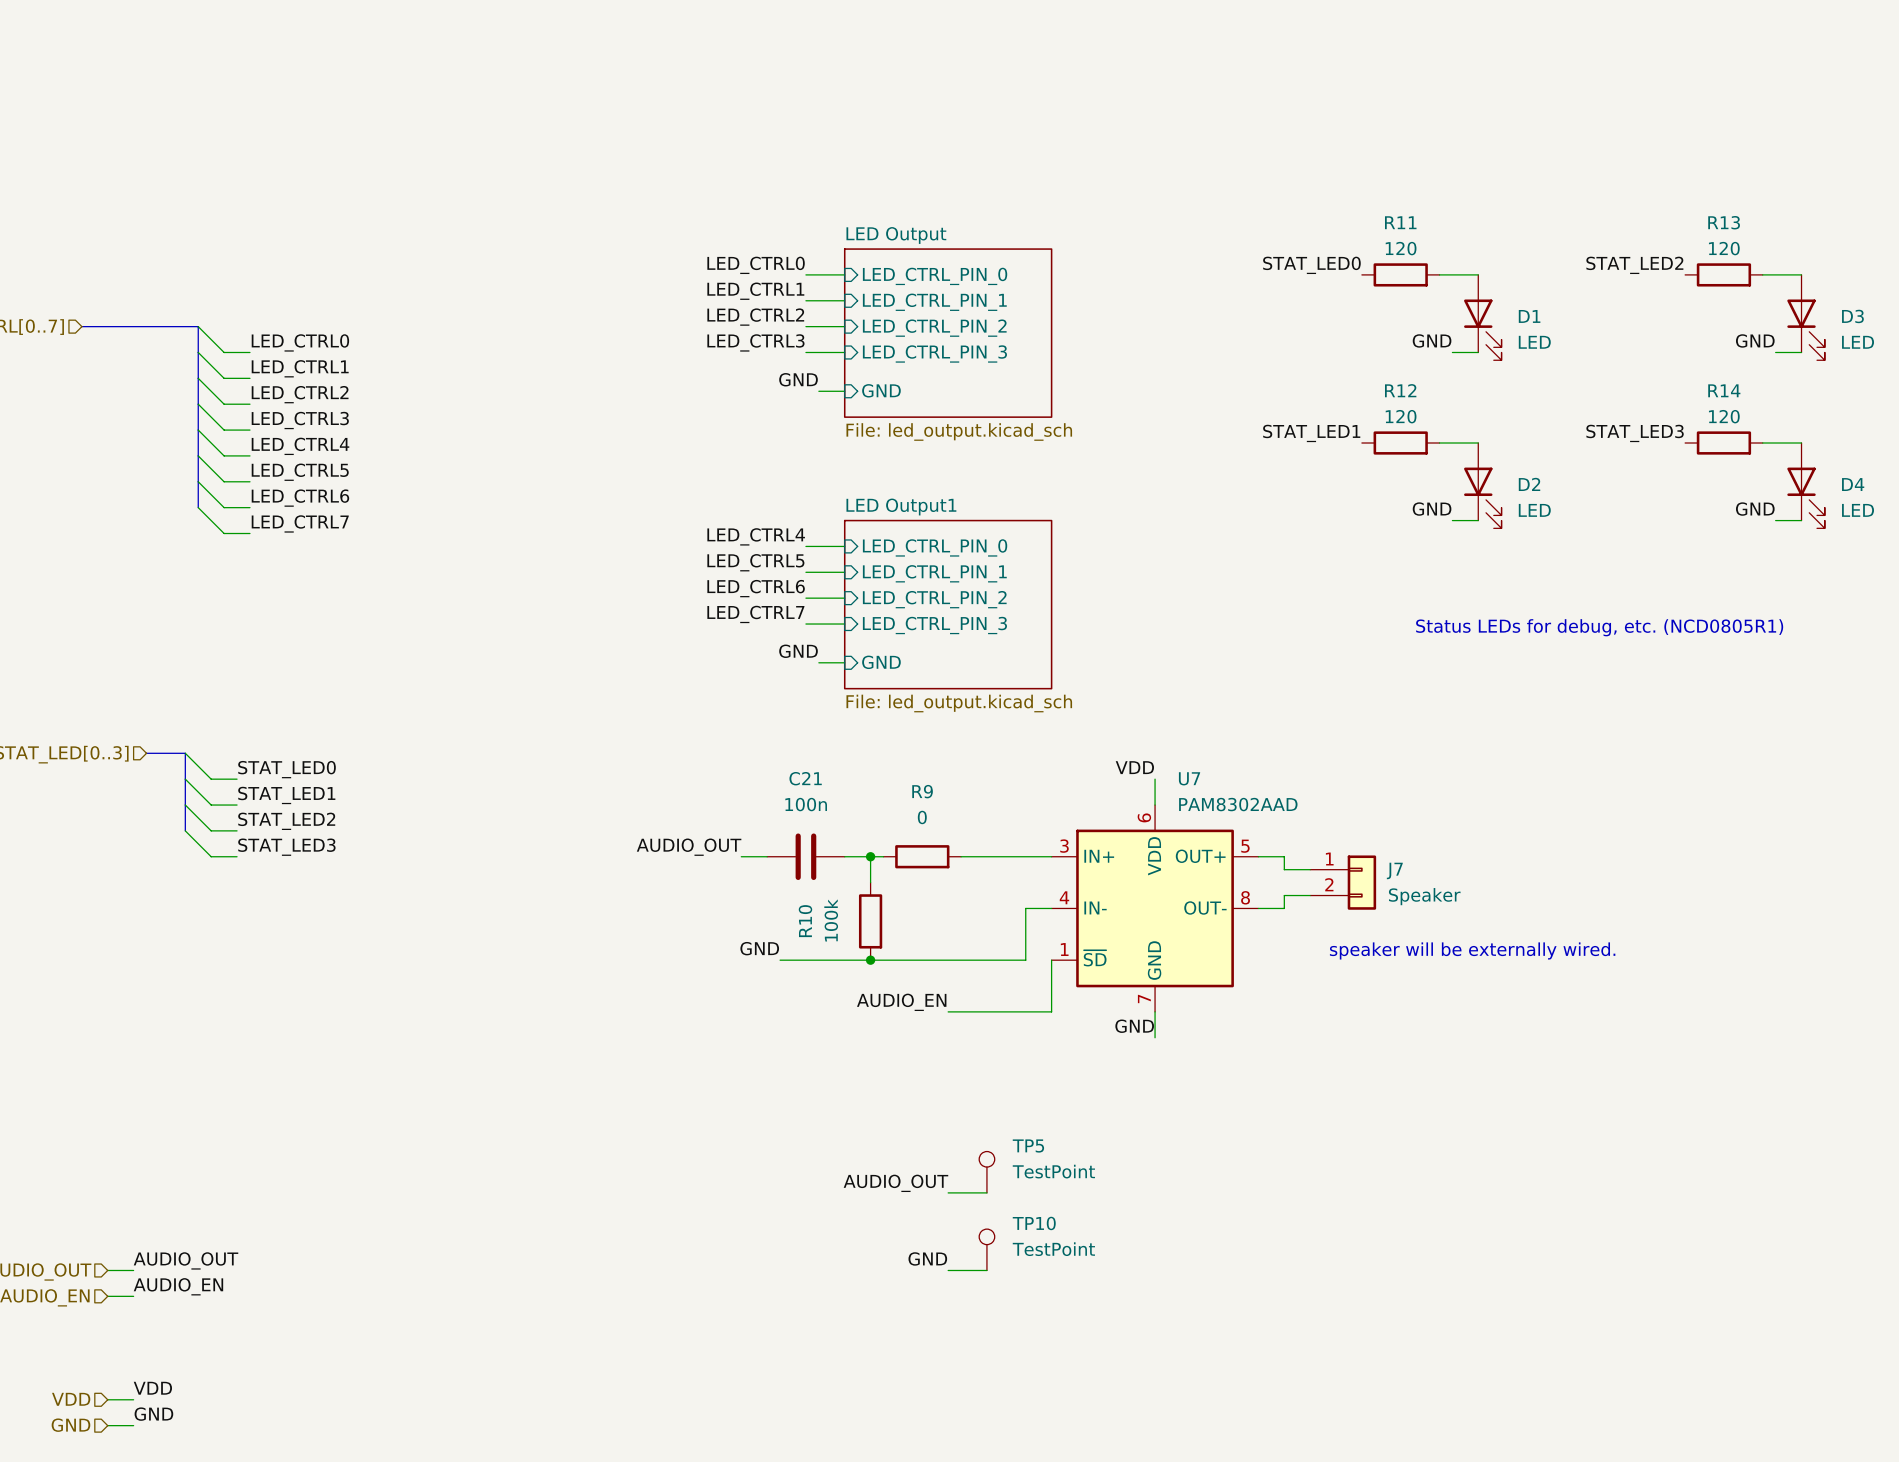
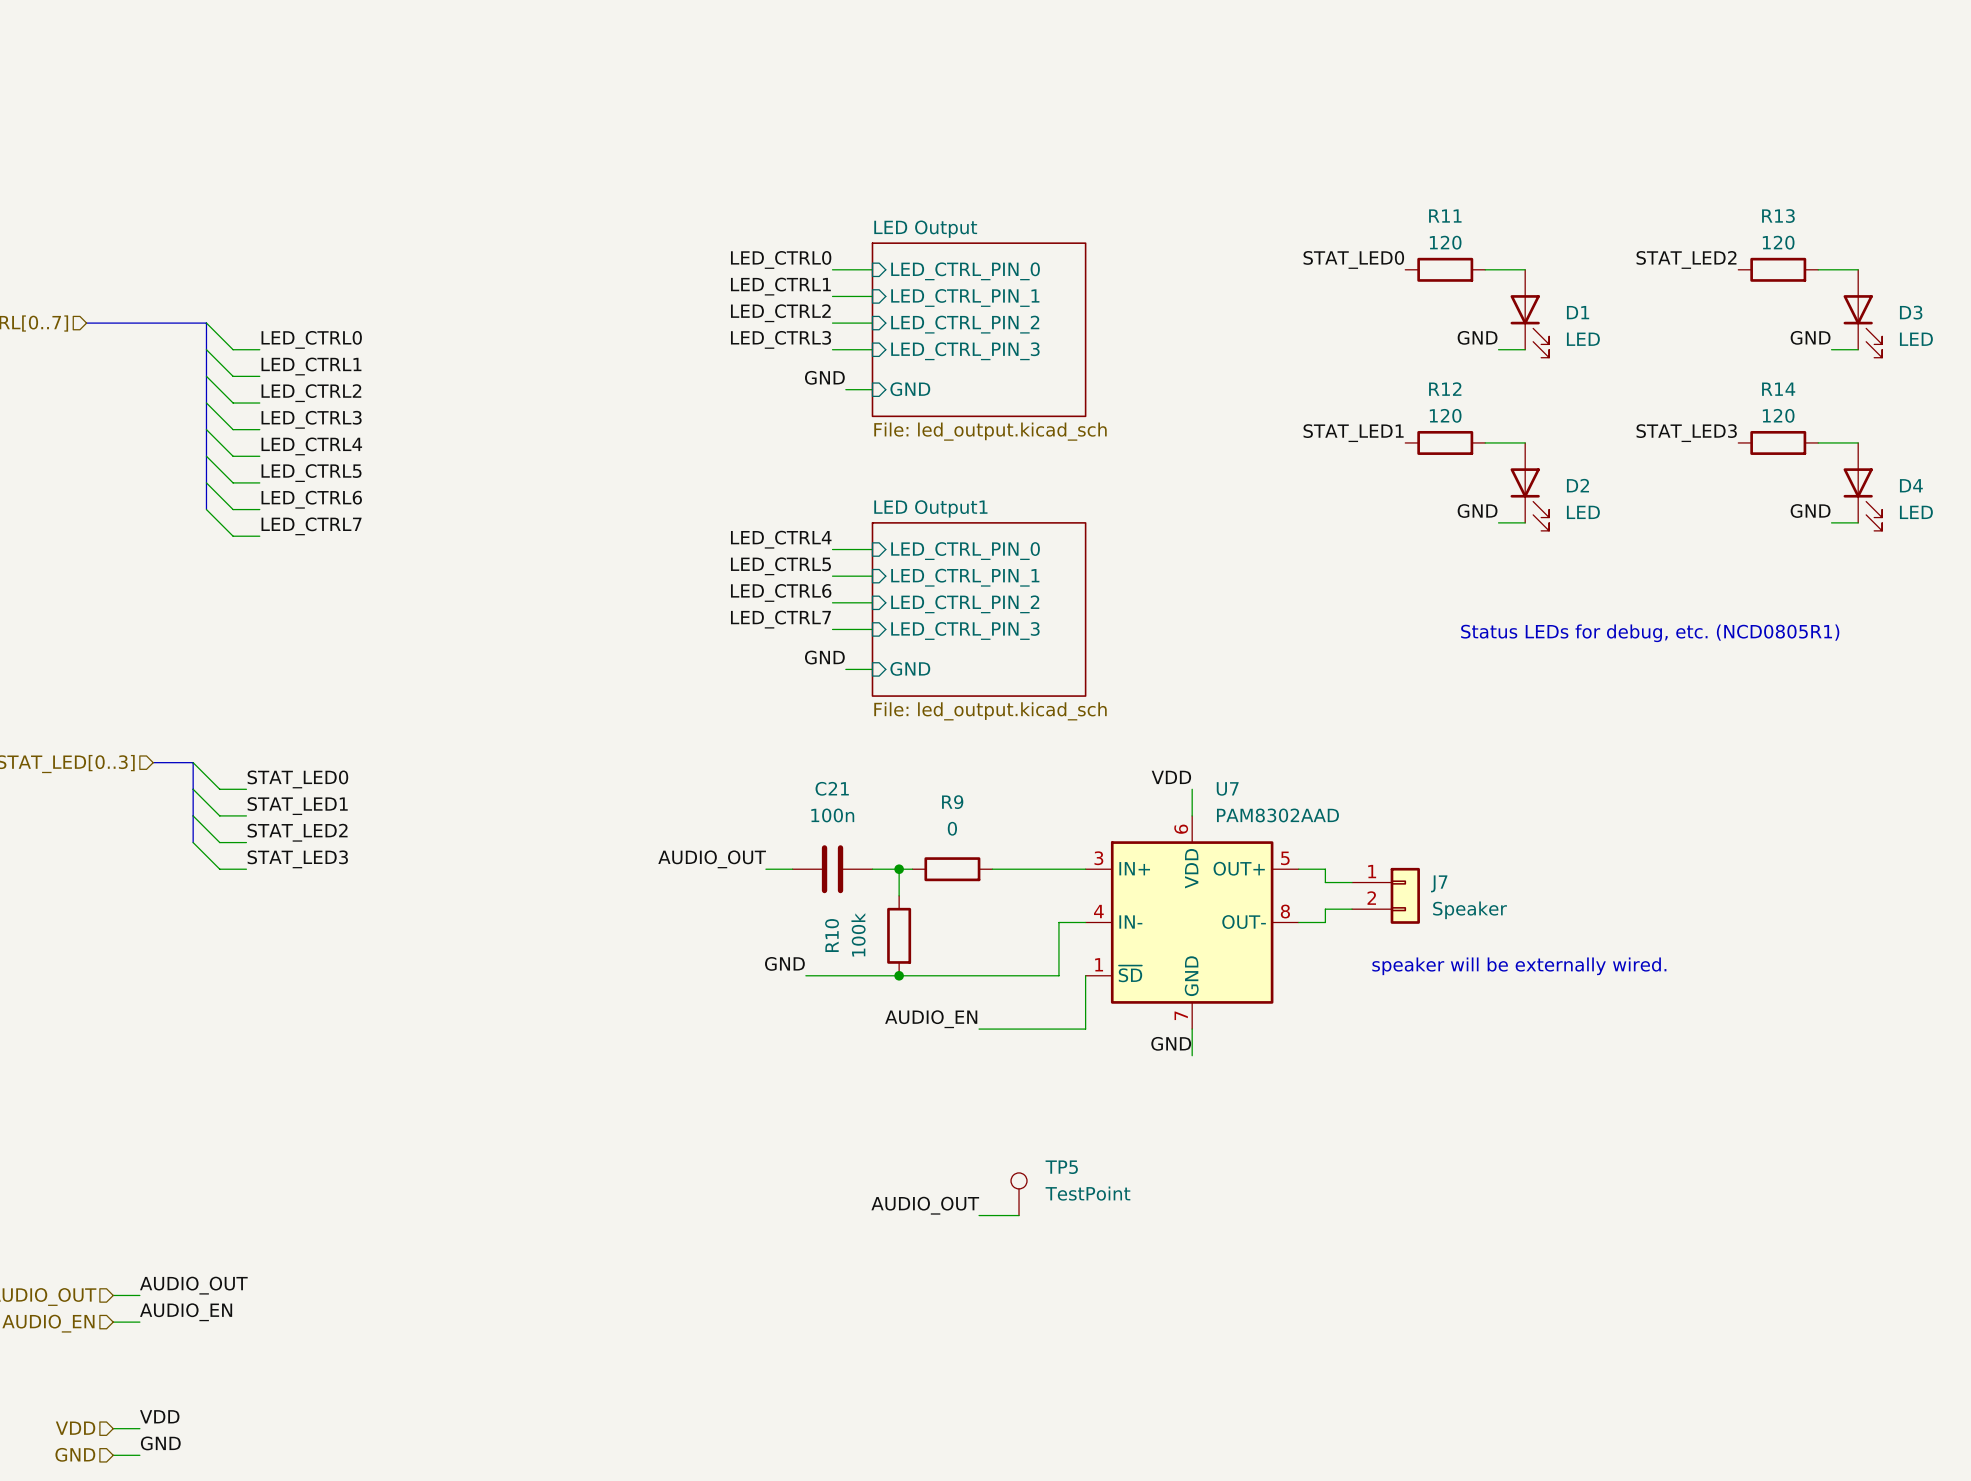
TP10: TestPoint (986, 1249) -> none
label: GND (927, 1258) -> none
wire: (948, 1270) (986, 1270) -> none

